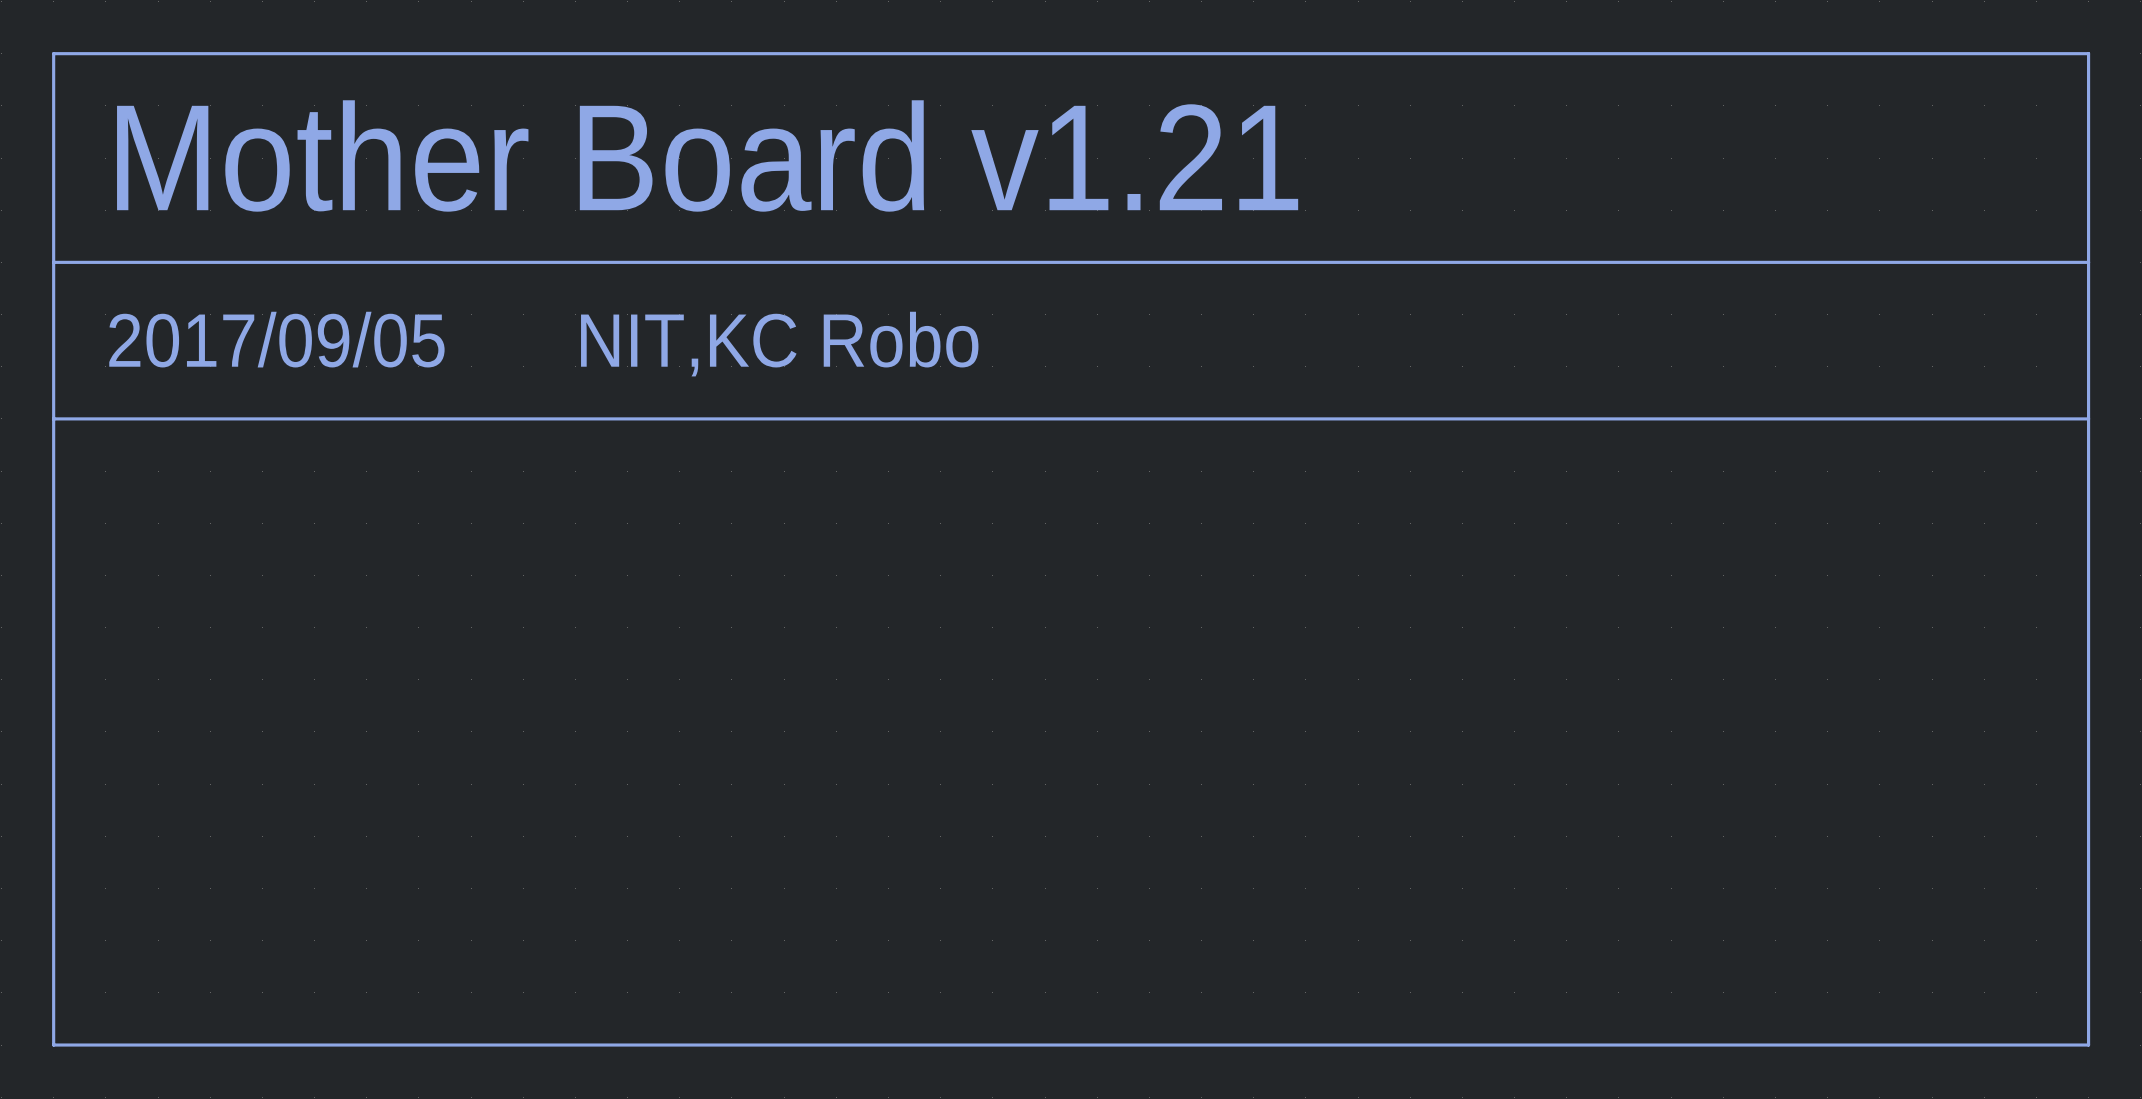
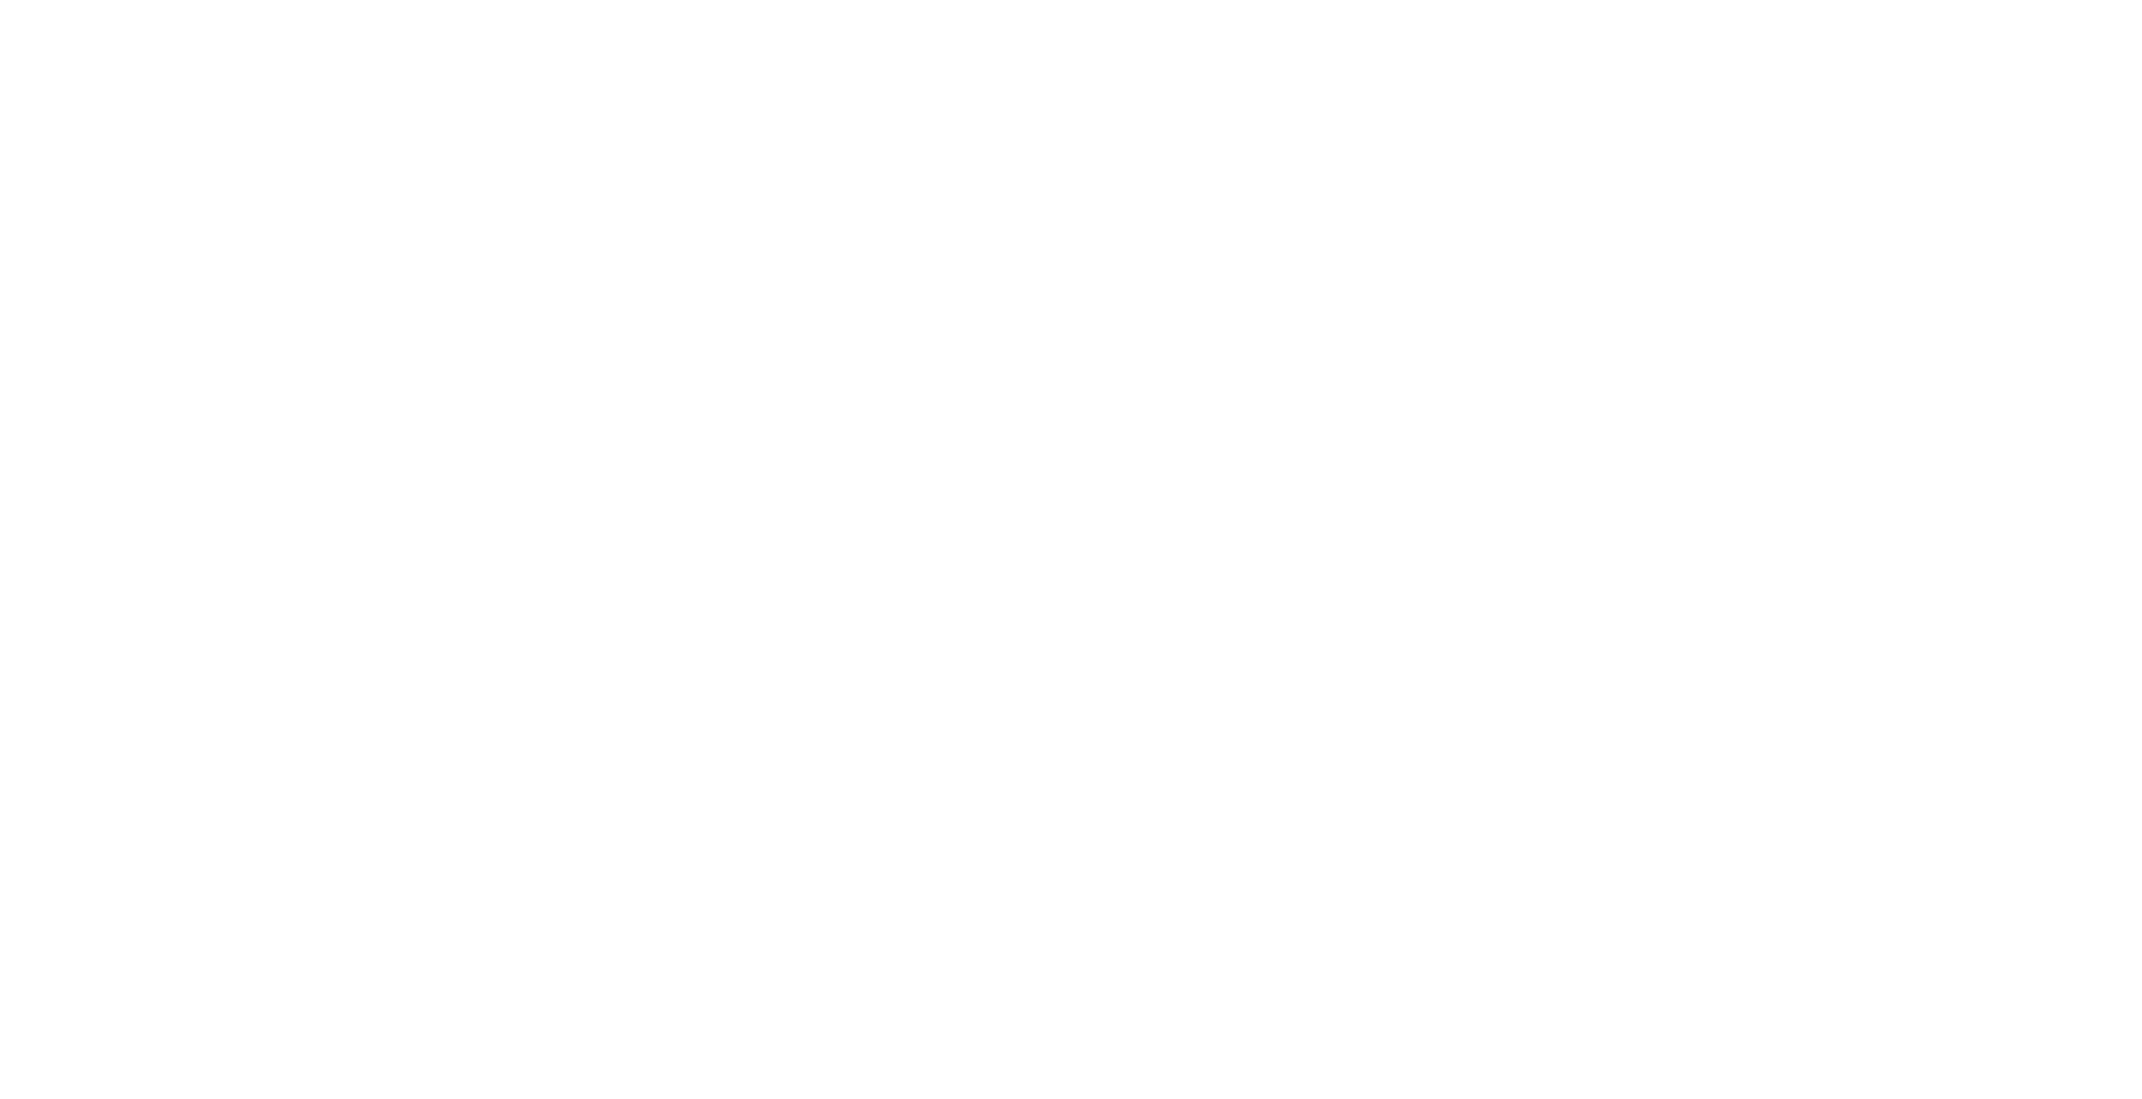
line: (53, 53) (2088, 53) (2088, 1045) (53, 1045) (53, 53) -> none
text: Mother Board v1.21 (707, 155) -> none
line: (53, 262) (2088, 262) -> none
text: 2017/09/05 (276, 339) -> none
text: NIT,KC Robo (779, 344) -> none
line: (53, 418) (2088, 418) -> none

